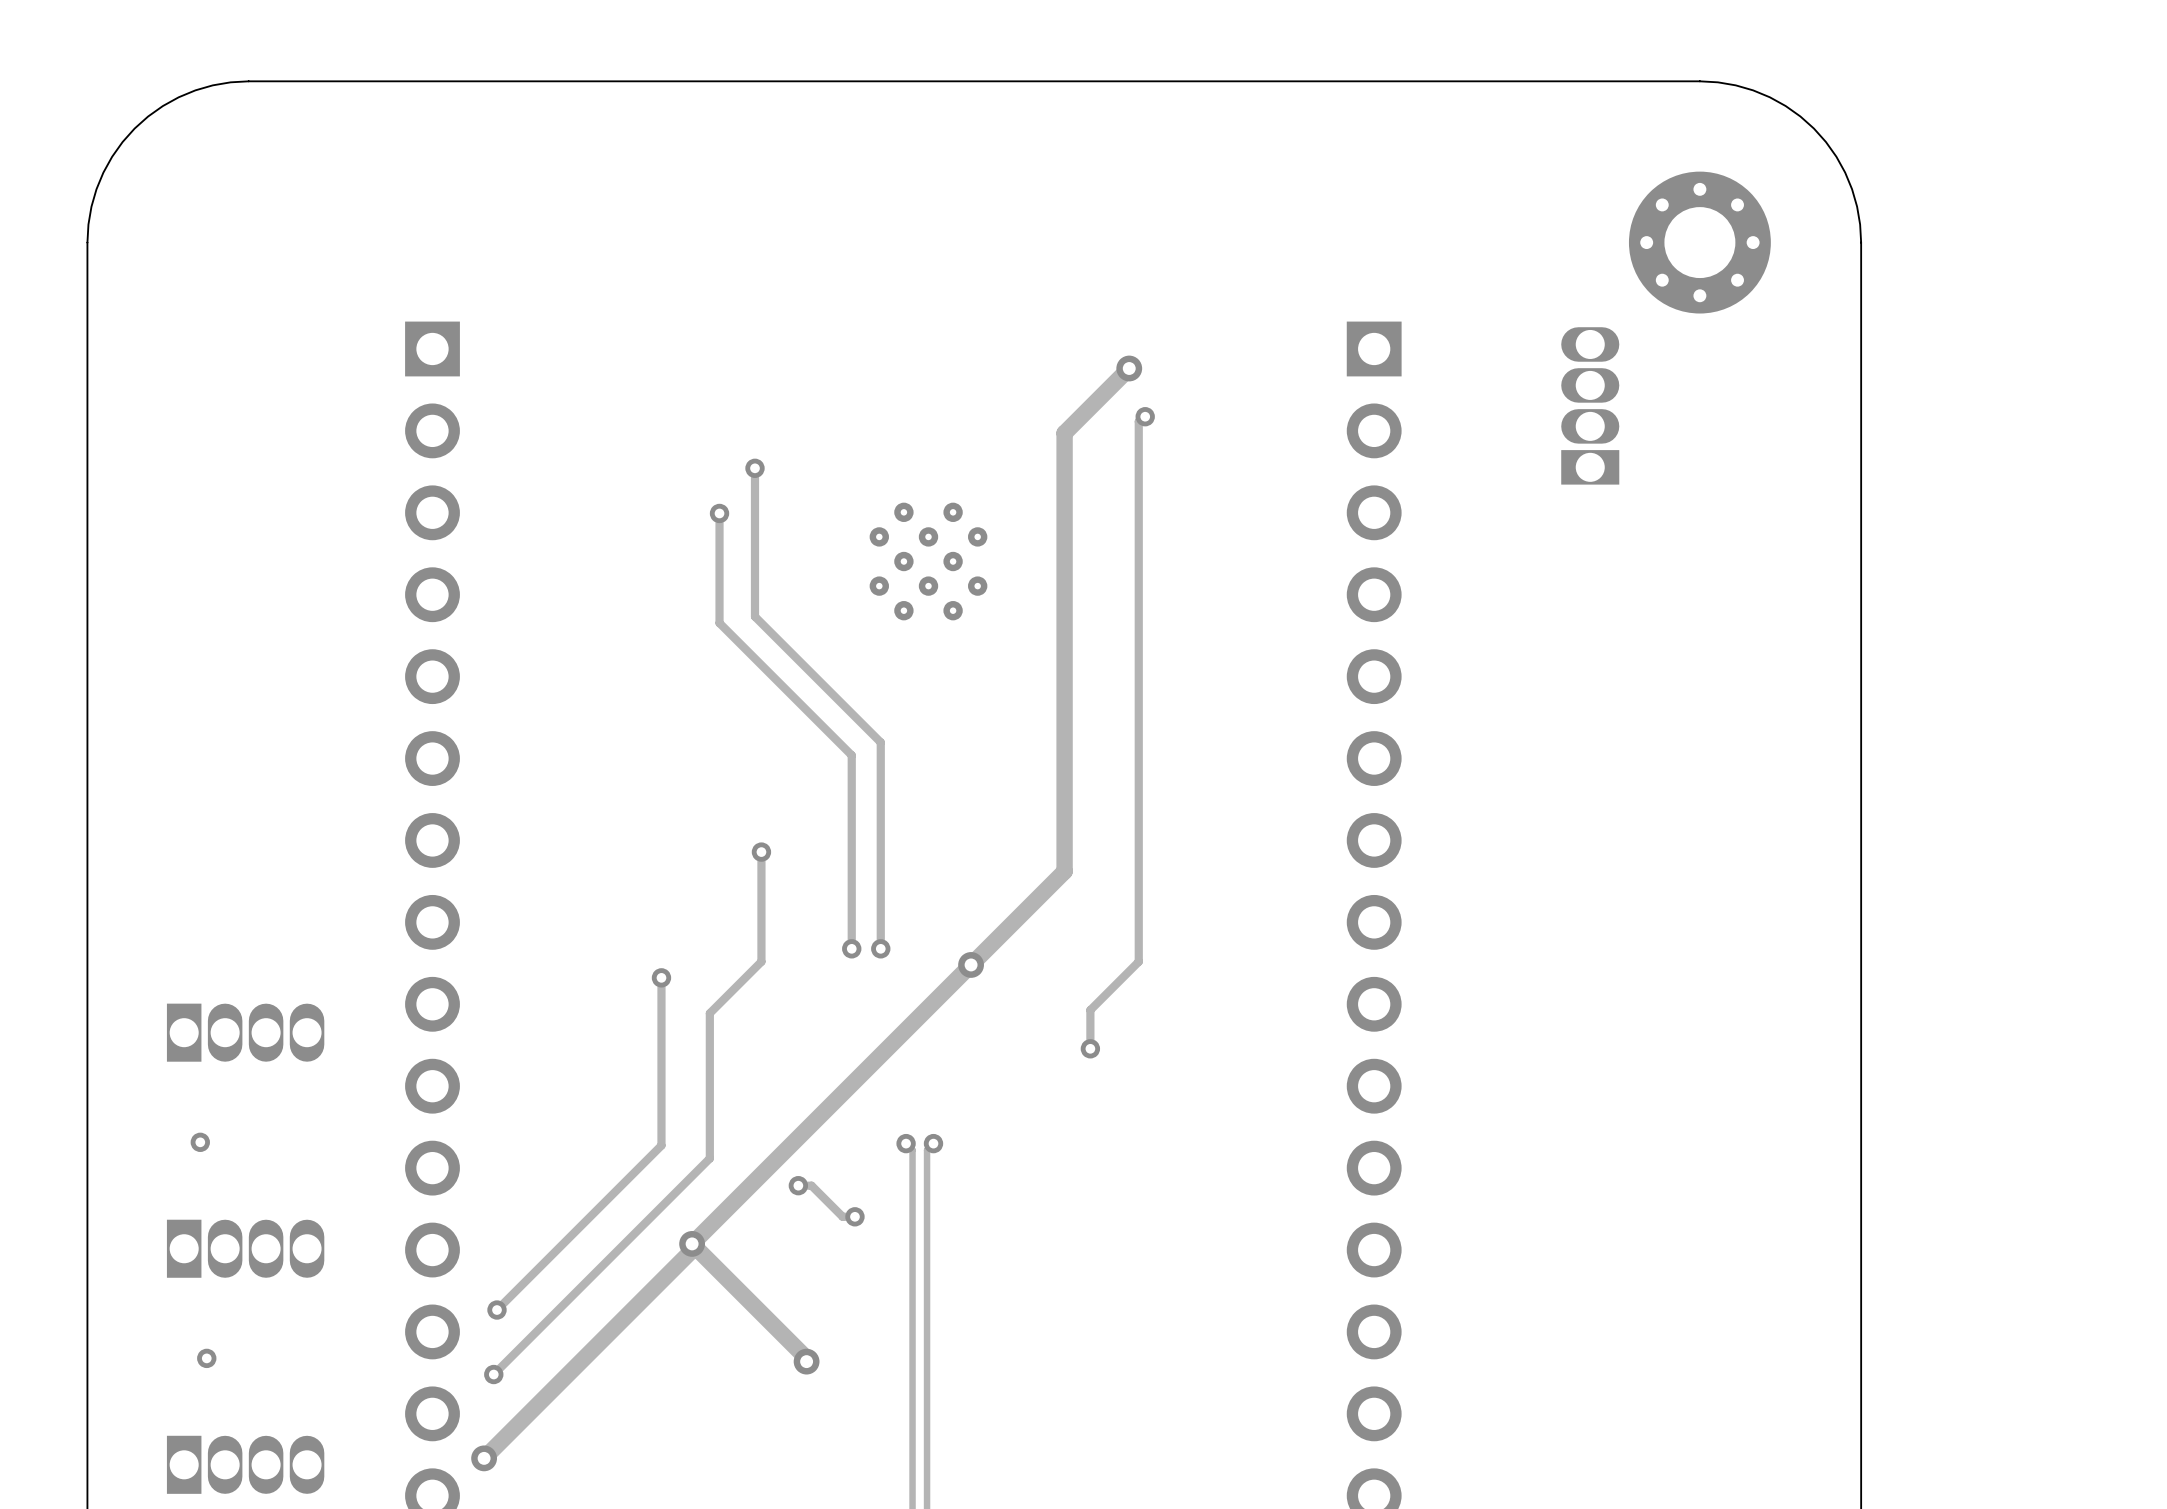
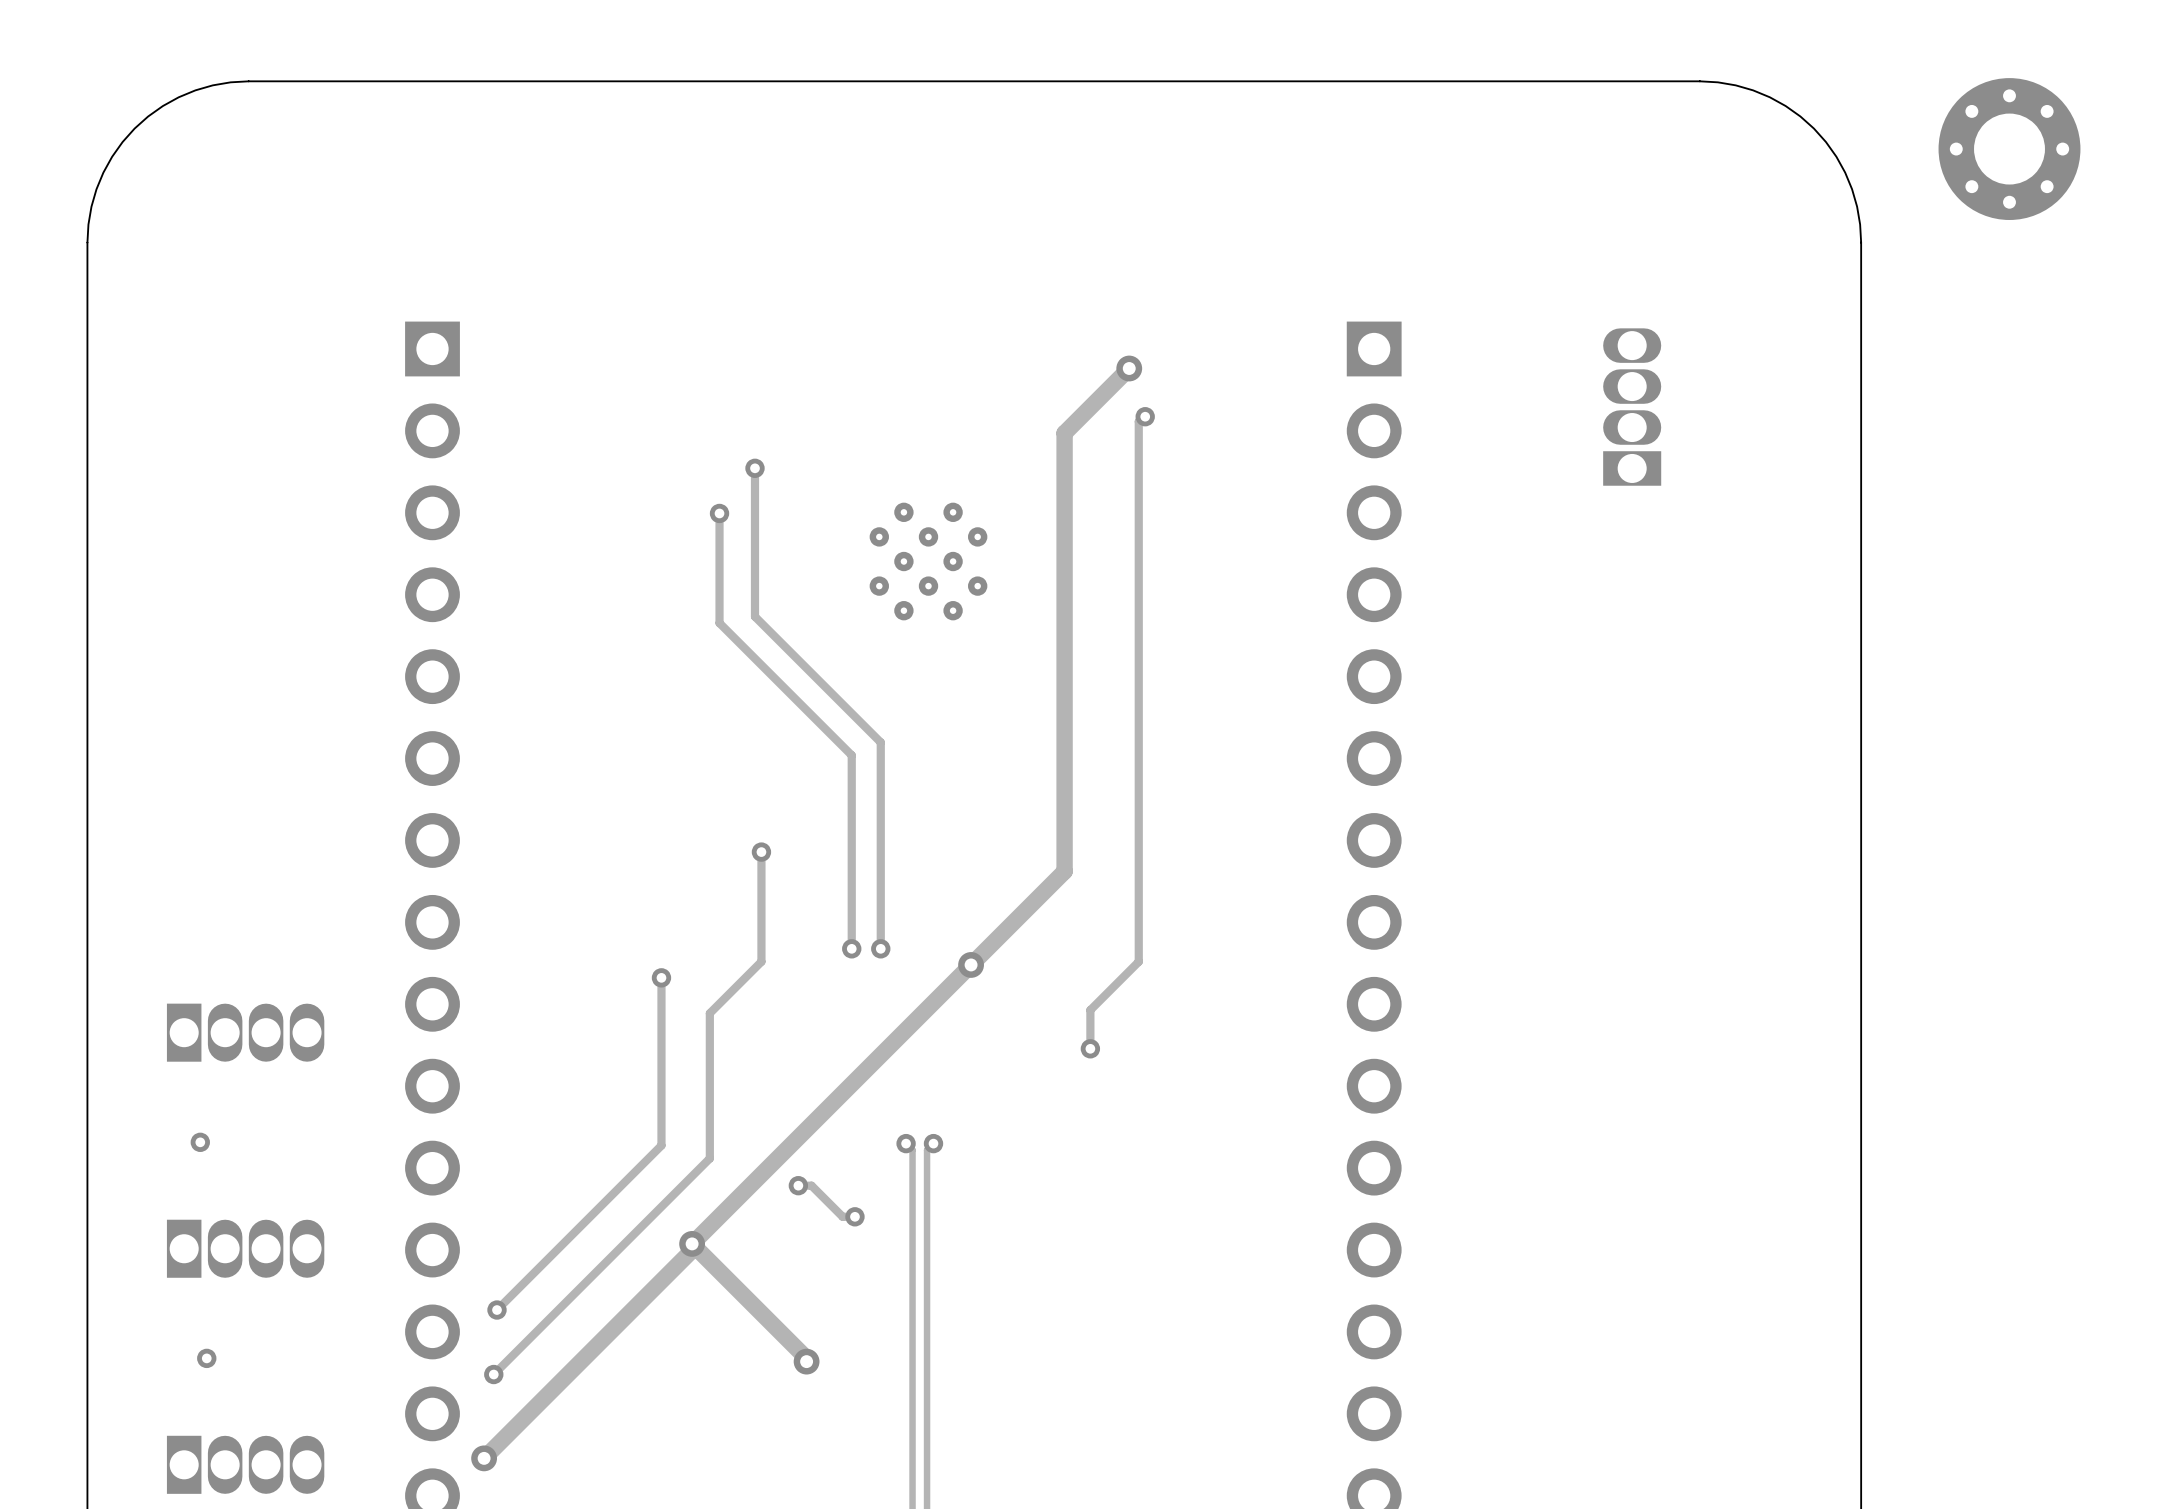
part position: (1699, 242) -> (2009, 149)
part position: (1590, 405) -> (1632, 407)

